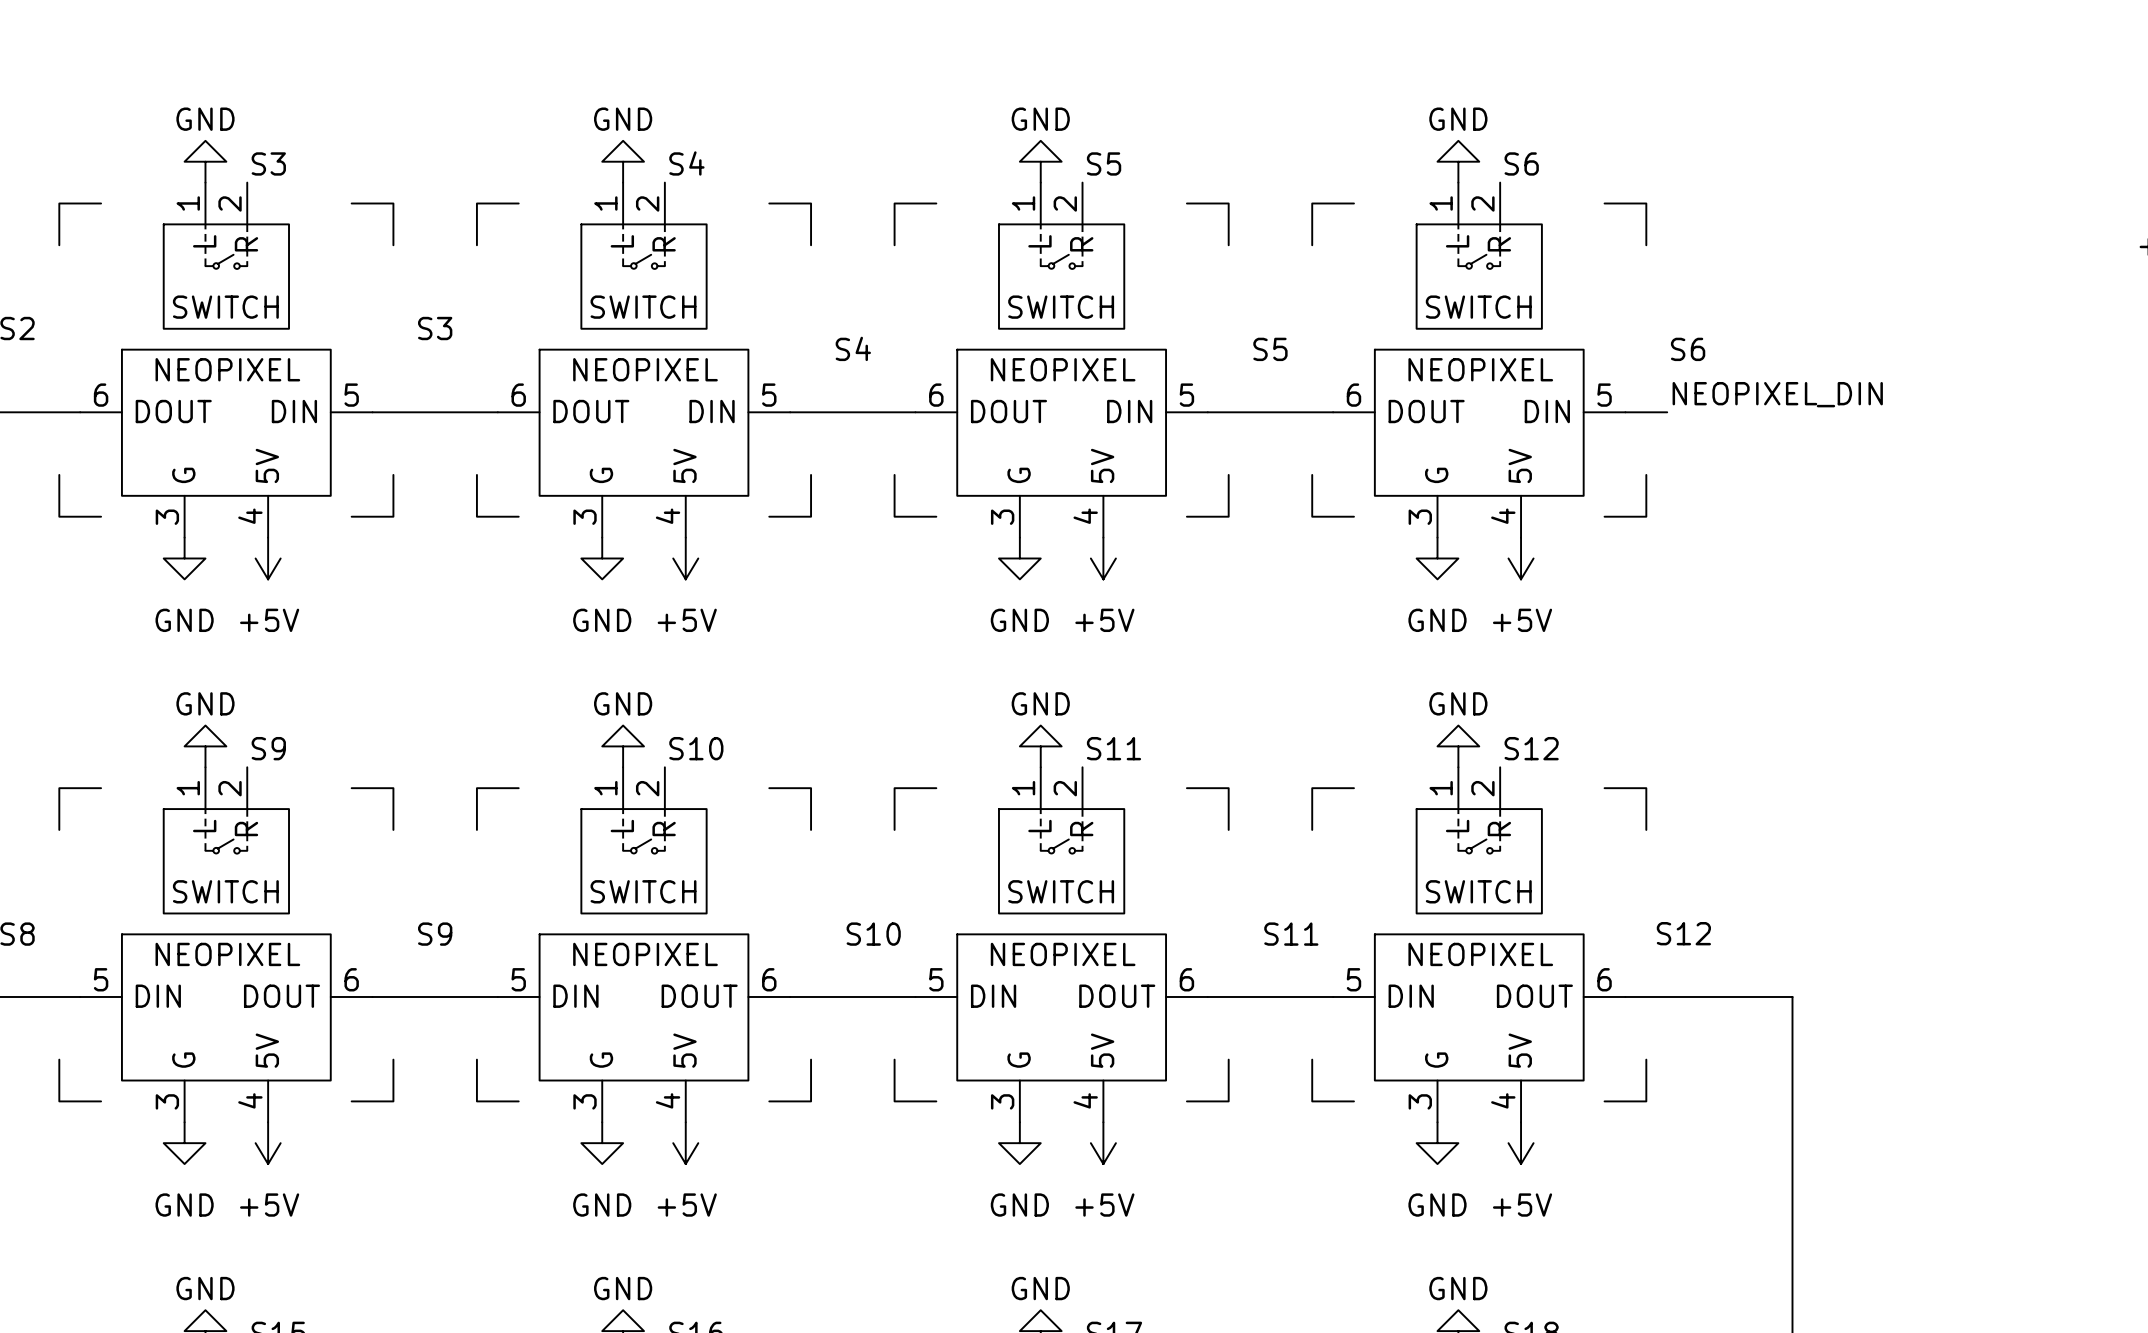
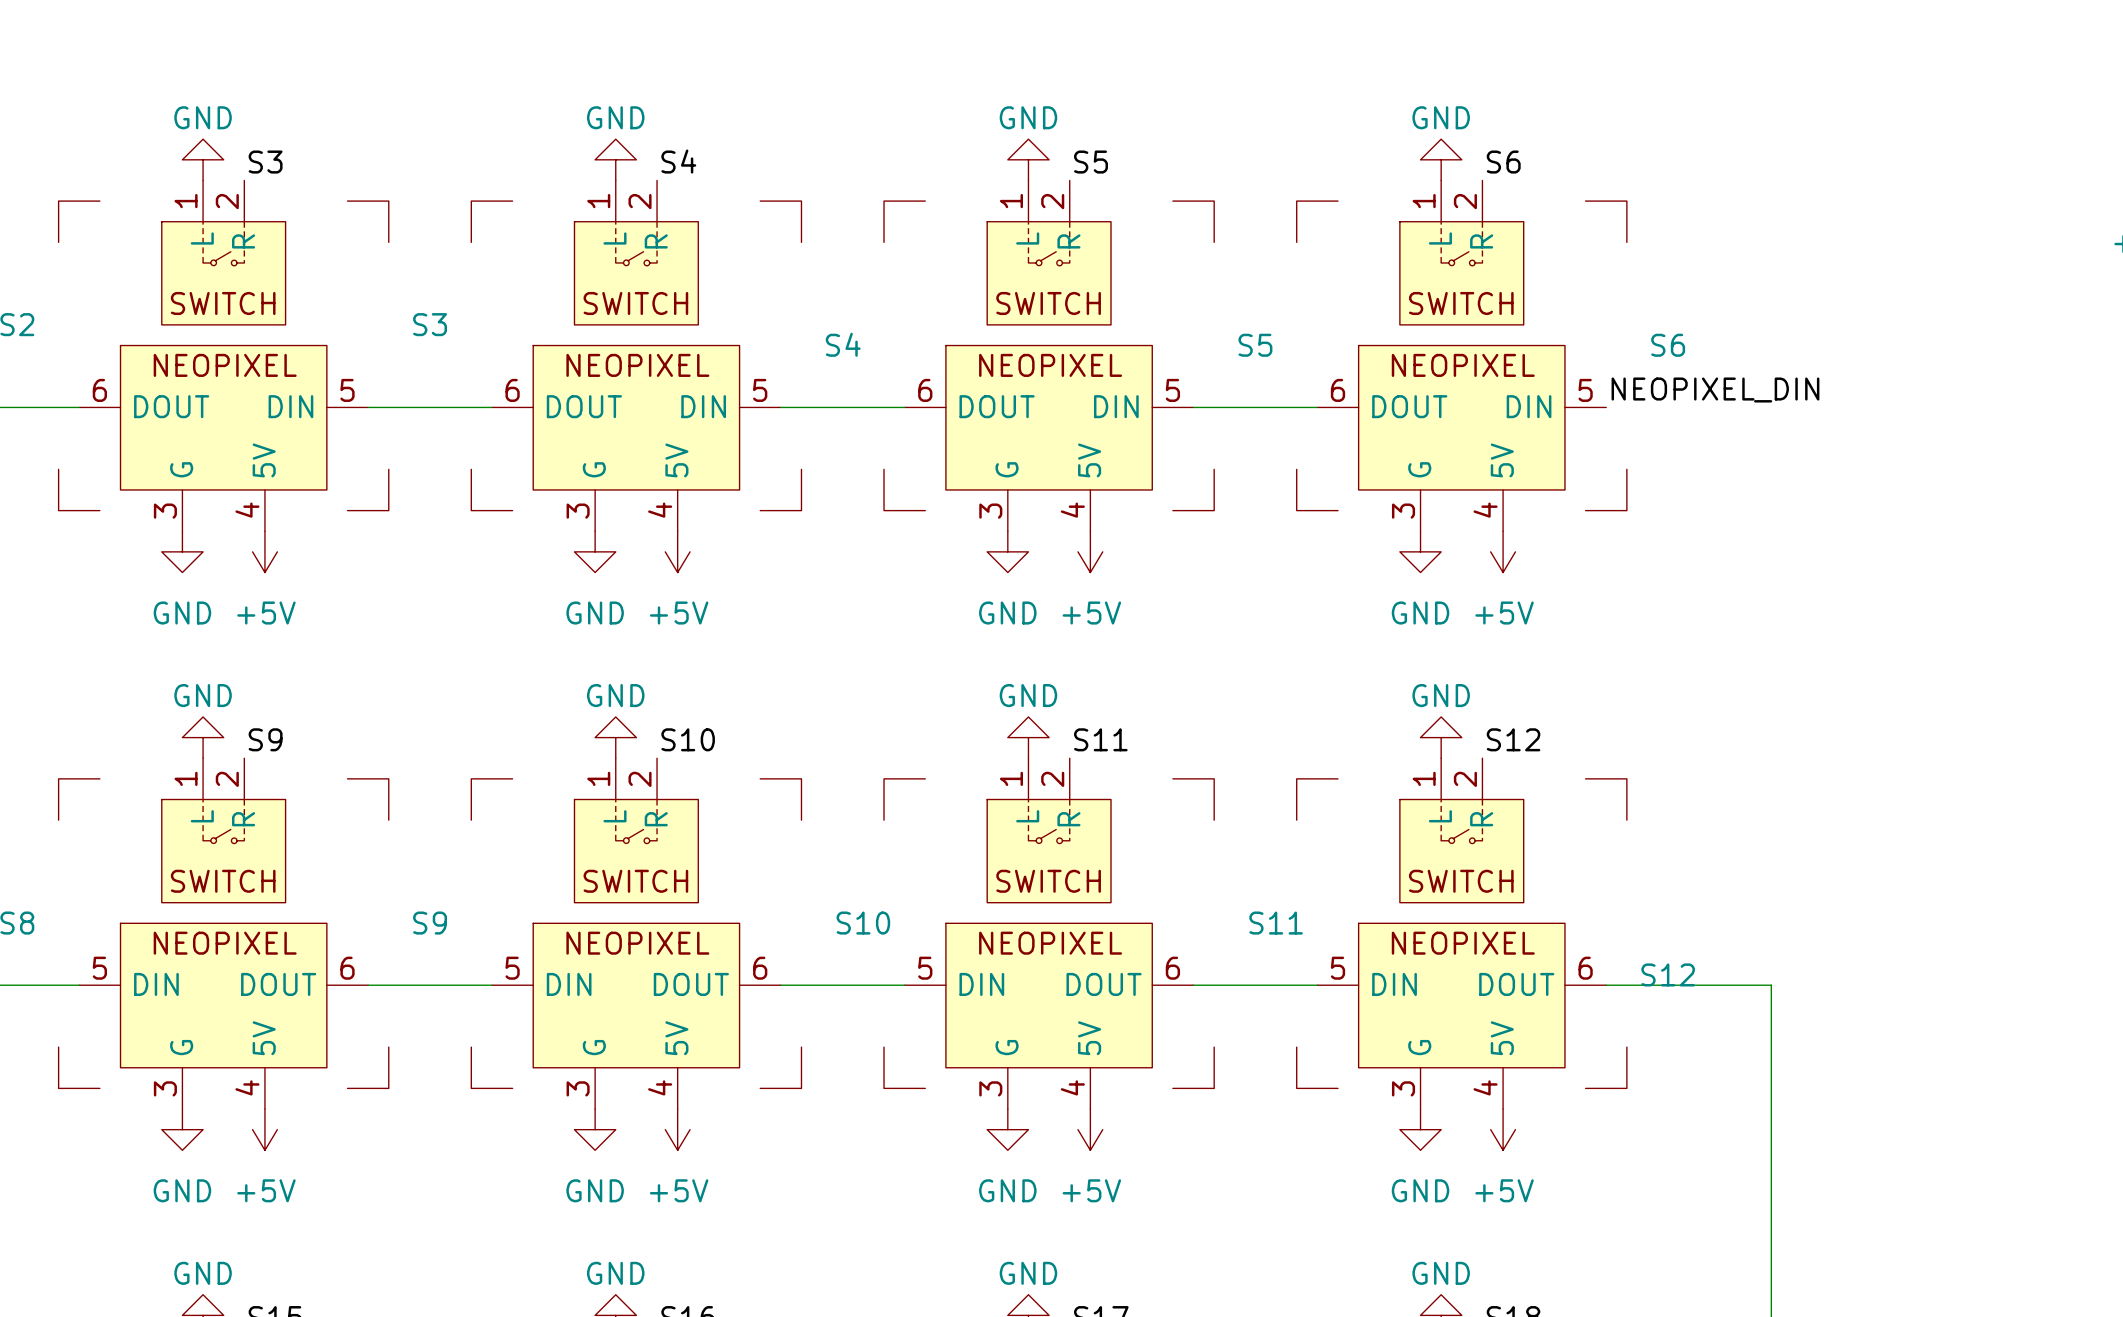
label position: NEOPIXEL_DIN (1777, 394) -> NEOPIXEL_DIN (1715, 390)
wire: (1625, 412) (1667, 412) -> none
S12 name position: S12 (1683, 933) -> S12 (1668, 974)

